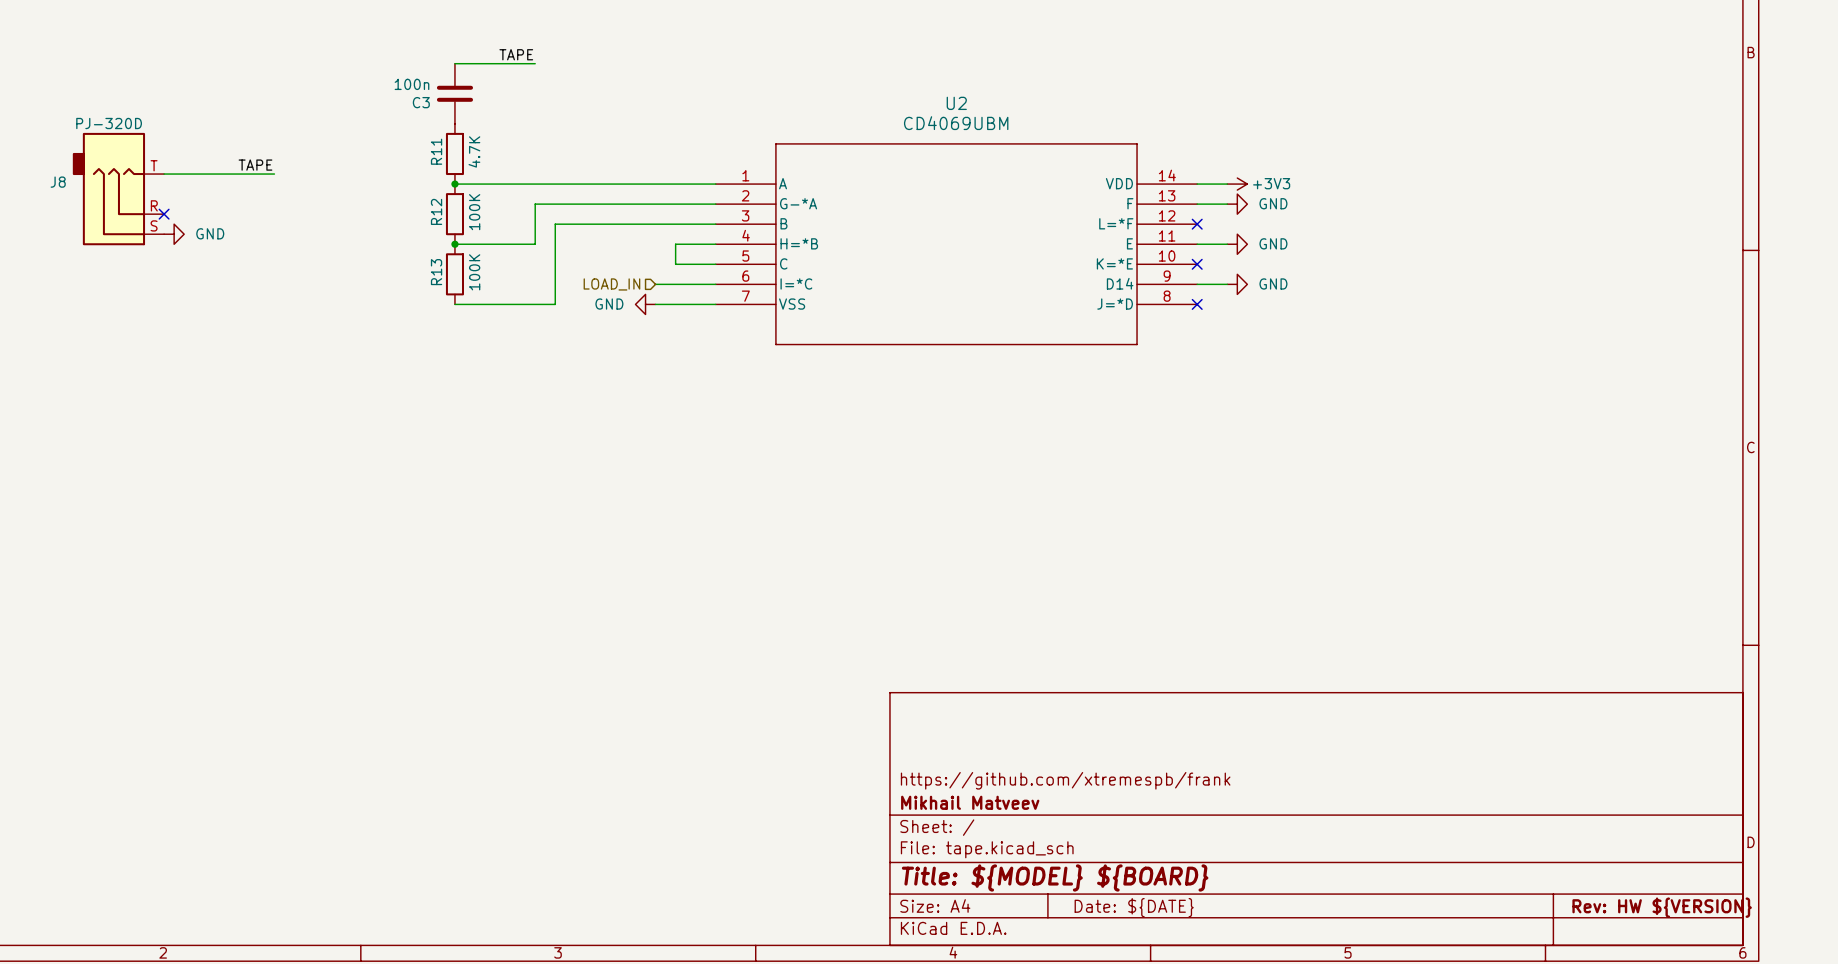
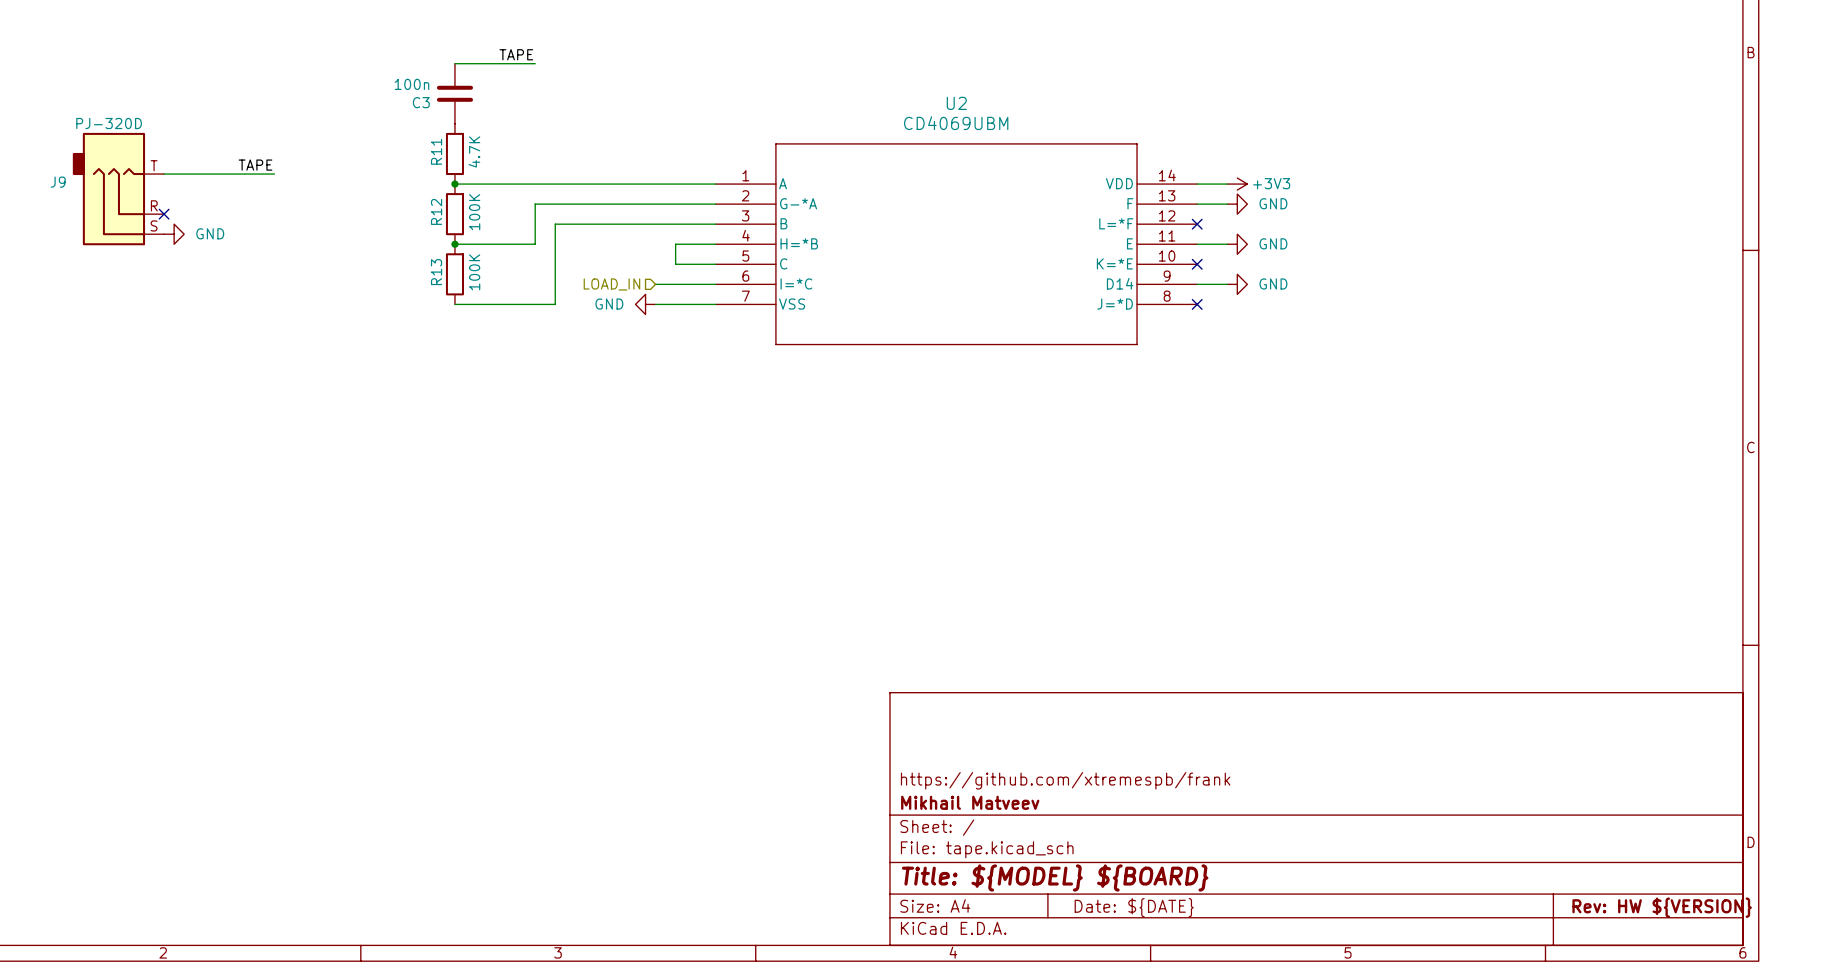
J8 name: J8 (58, 182) -> J9 (58, 182)

